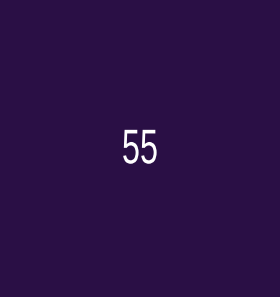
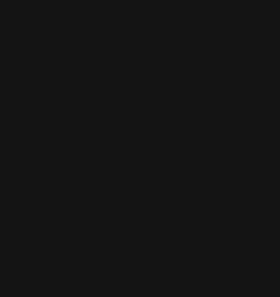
text: 55 (139, 146) -> none

